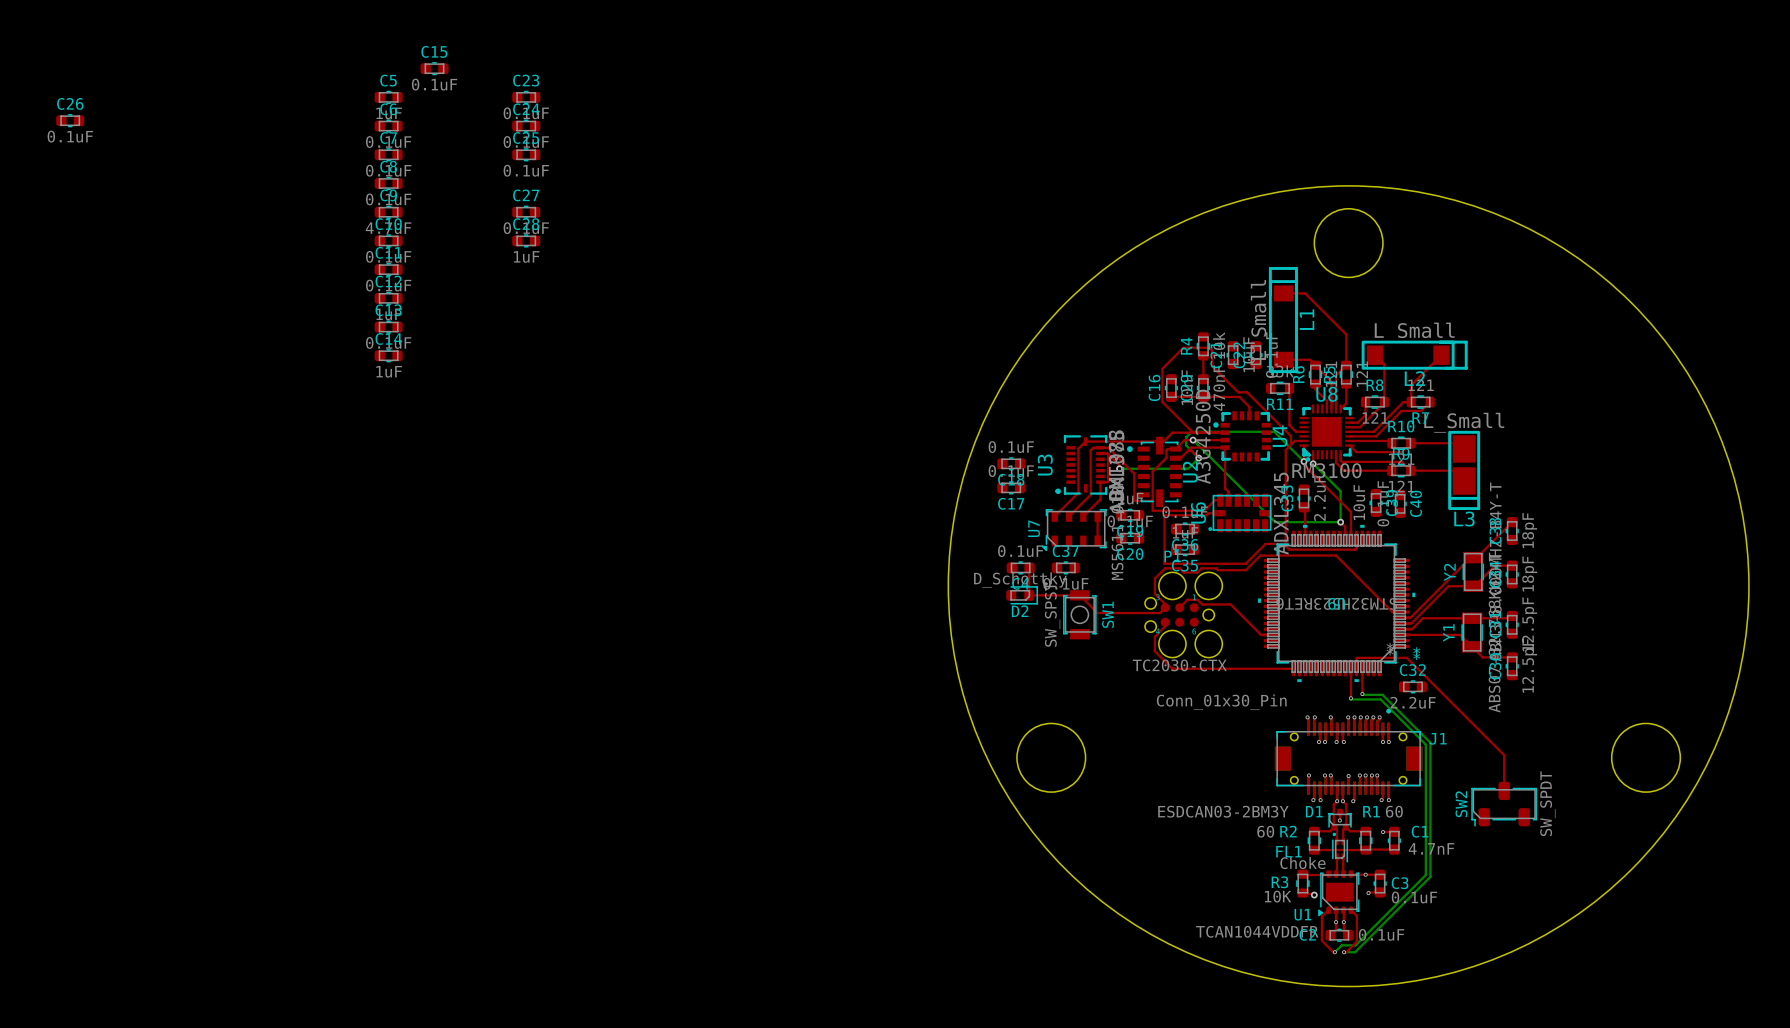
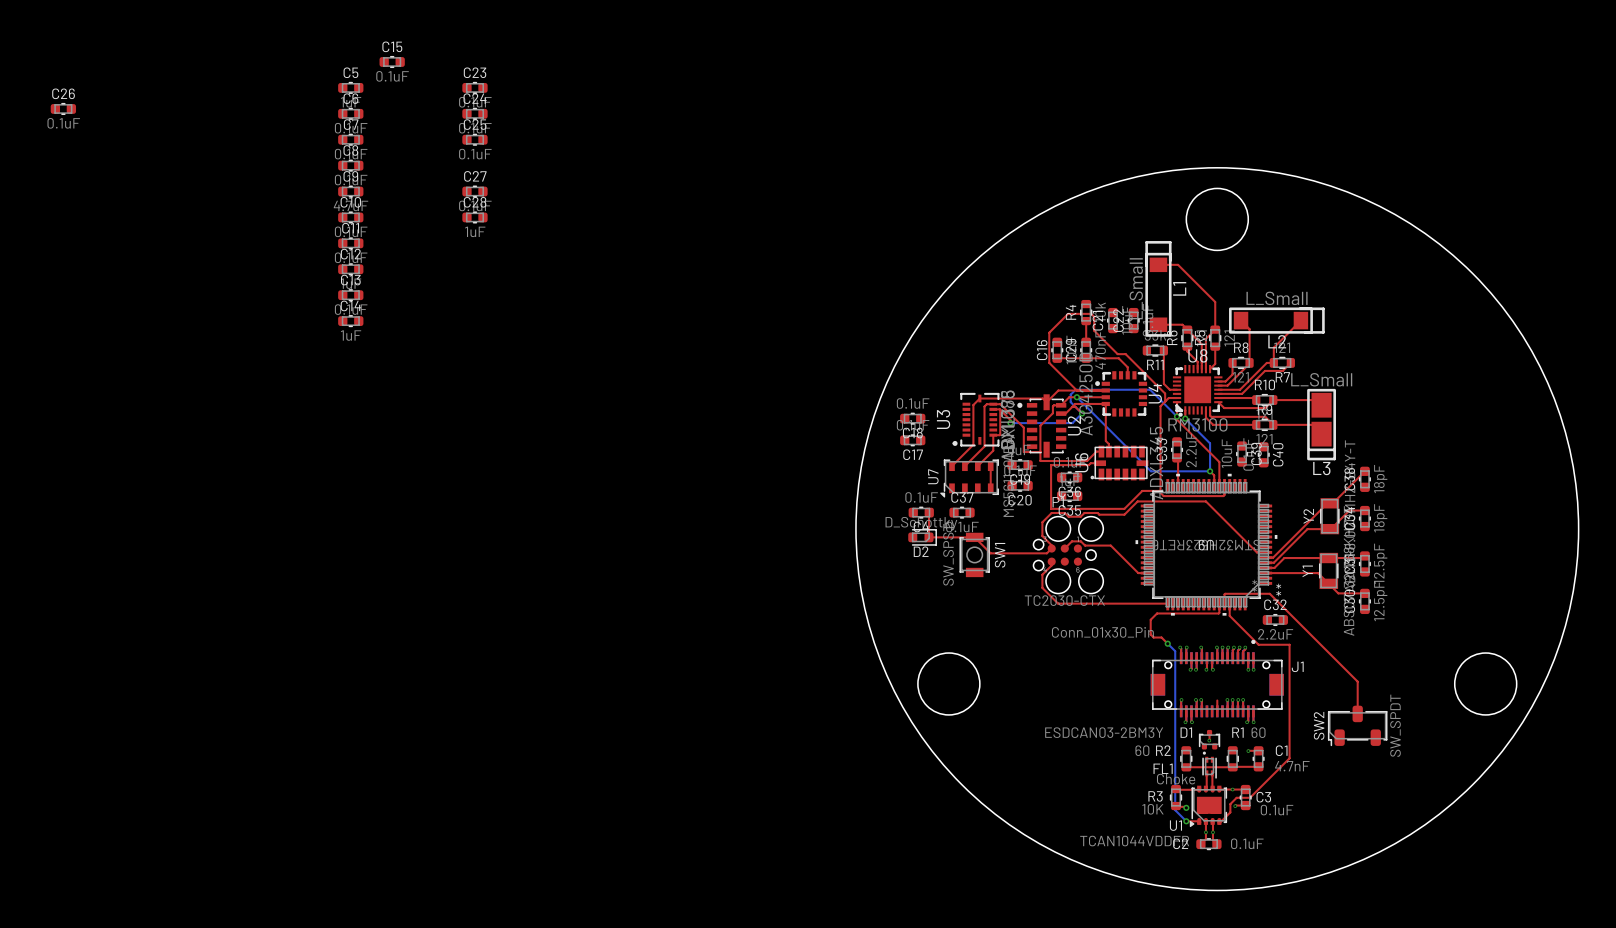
top track: (1350, 678) (1350, 698) -> (1219, 612) (1157, 613) (1150, 619) (1150, 634) (1153, 637) (1161, 637) (1167, 643)
top track: (1362, 682) (1362, 694) -> (1229, 615) (1258, 644) (1289, 644) (1289, 758) (1250, 797) (1236, 797) (1230, 804) (1230, 812) (1219, 823)
bottom track: (1362, 694) (1382, 694) (1430, 742) (1430, 876) (1355, 952) (1344, 952) -> none
via: (1362, 694) -> none
bottom track: (1350, 698) (1380, 699) (1425, 744) (1425, 875) (1355, 945) (1341, 945) (1334, 952) -> none
via: (1350, 698) -> none
bottom track: none -> (1167, 643) (1175, 651) (1175, 810) (1186, 821)
via: none -> (1167, 643)
via: (1348, 776) -> none
top track: (1337, 788) (1337, 801) (1333, 804) (1333, 826) (1336, 829) (1336, 841) -> none
top track: (1342, 788) (1342, 801) (1346, 804) (1346, 826) (1343, 829) (1343, 841) -> none
top track: (1354, 788) (1353, 801) -> none
via: (1337, 801) -> none
via: (1342, 801) -> none
via: (1353, 801) -> none
top track: (1334, 826) (1330, 831) (1314, 831) -> none
top track: (1345, 826) (1350, 831) (1365, 831) -> none
via: none -> (1186, 821)
top track: (1328, 909) (1321, 916) (1321, 940) (1334, 952) -> (1199, 821) (1186, 821)
top track: (1350, 909) (1356, 915) (1356, 941) (1344, 952) -> none
via: (1334, 952) -> none
via: (1344, 952) -> none

